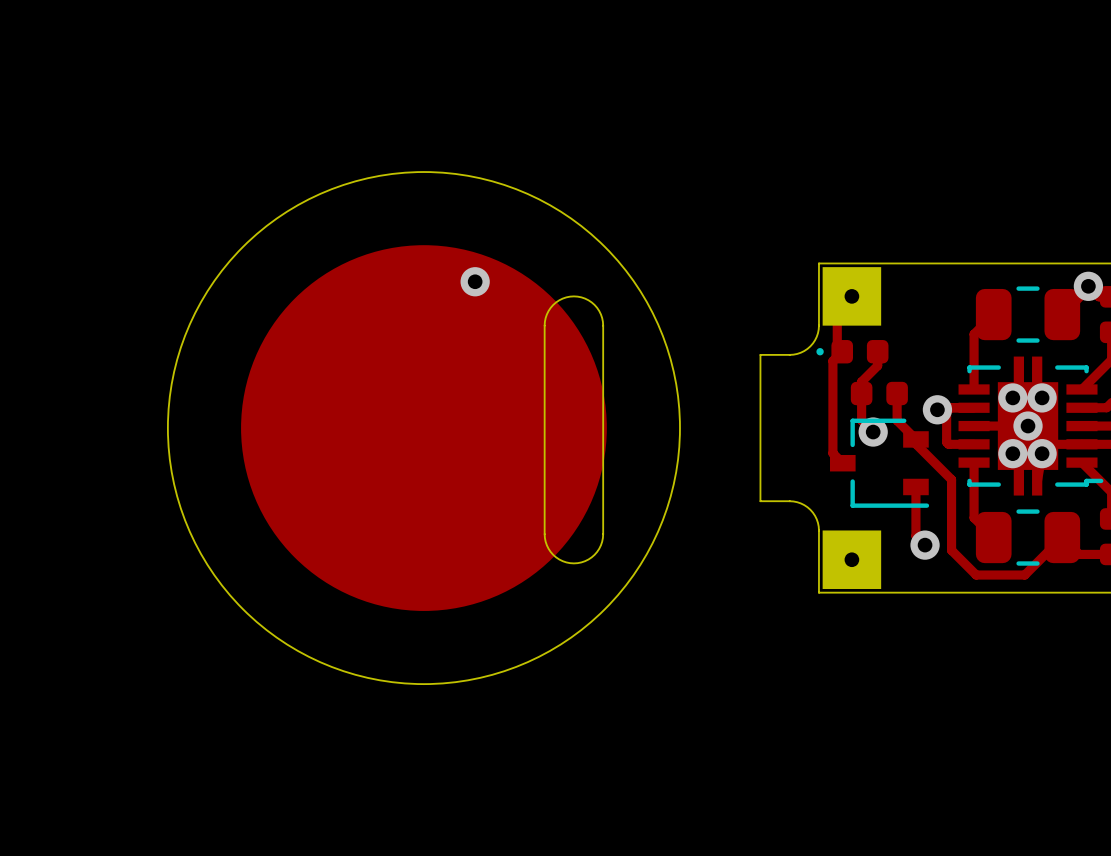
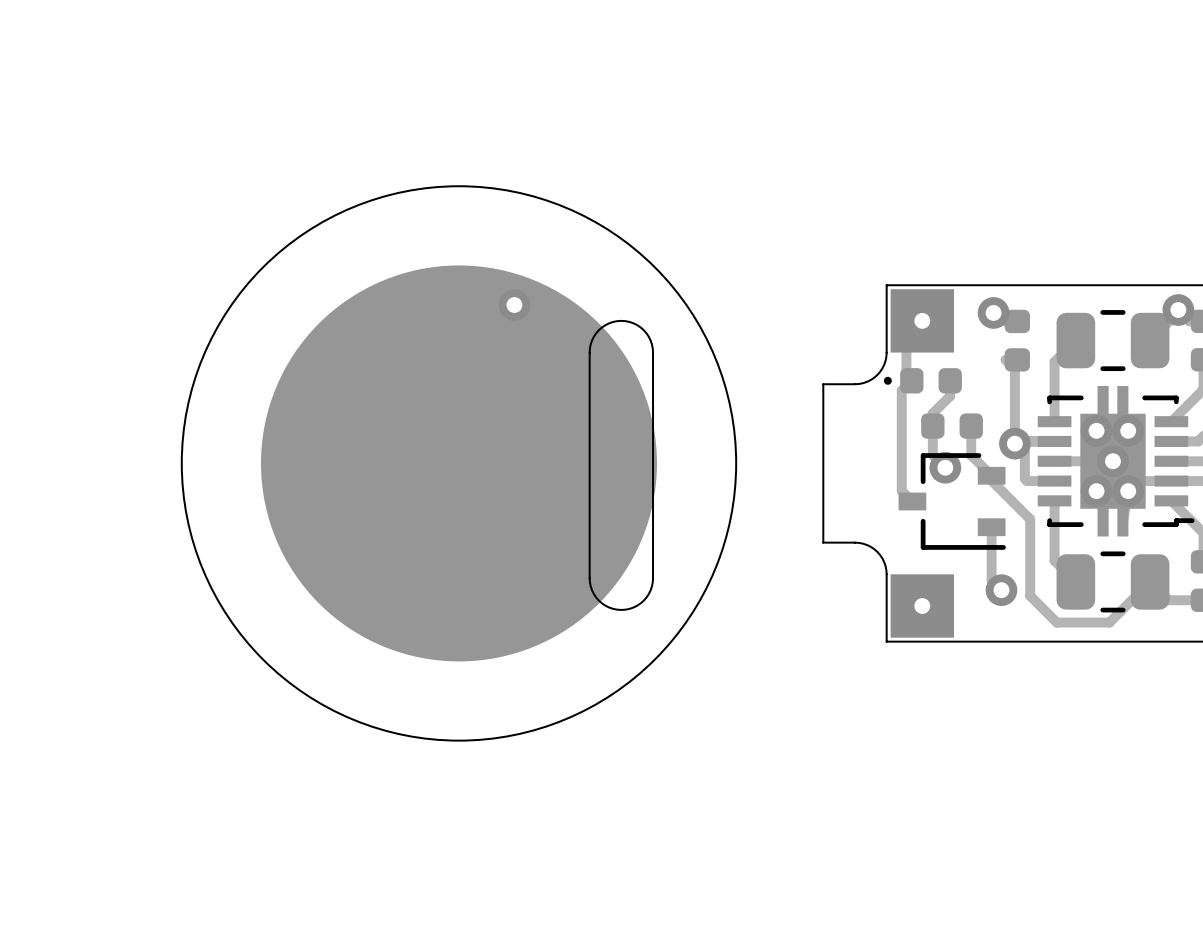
via: none -> (993, 312)
part: none -> (1017, 340)
track: none -> (1005, 359) (1014, 369) (1014, 443)

